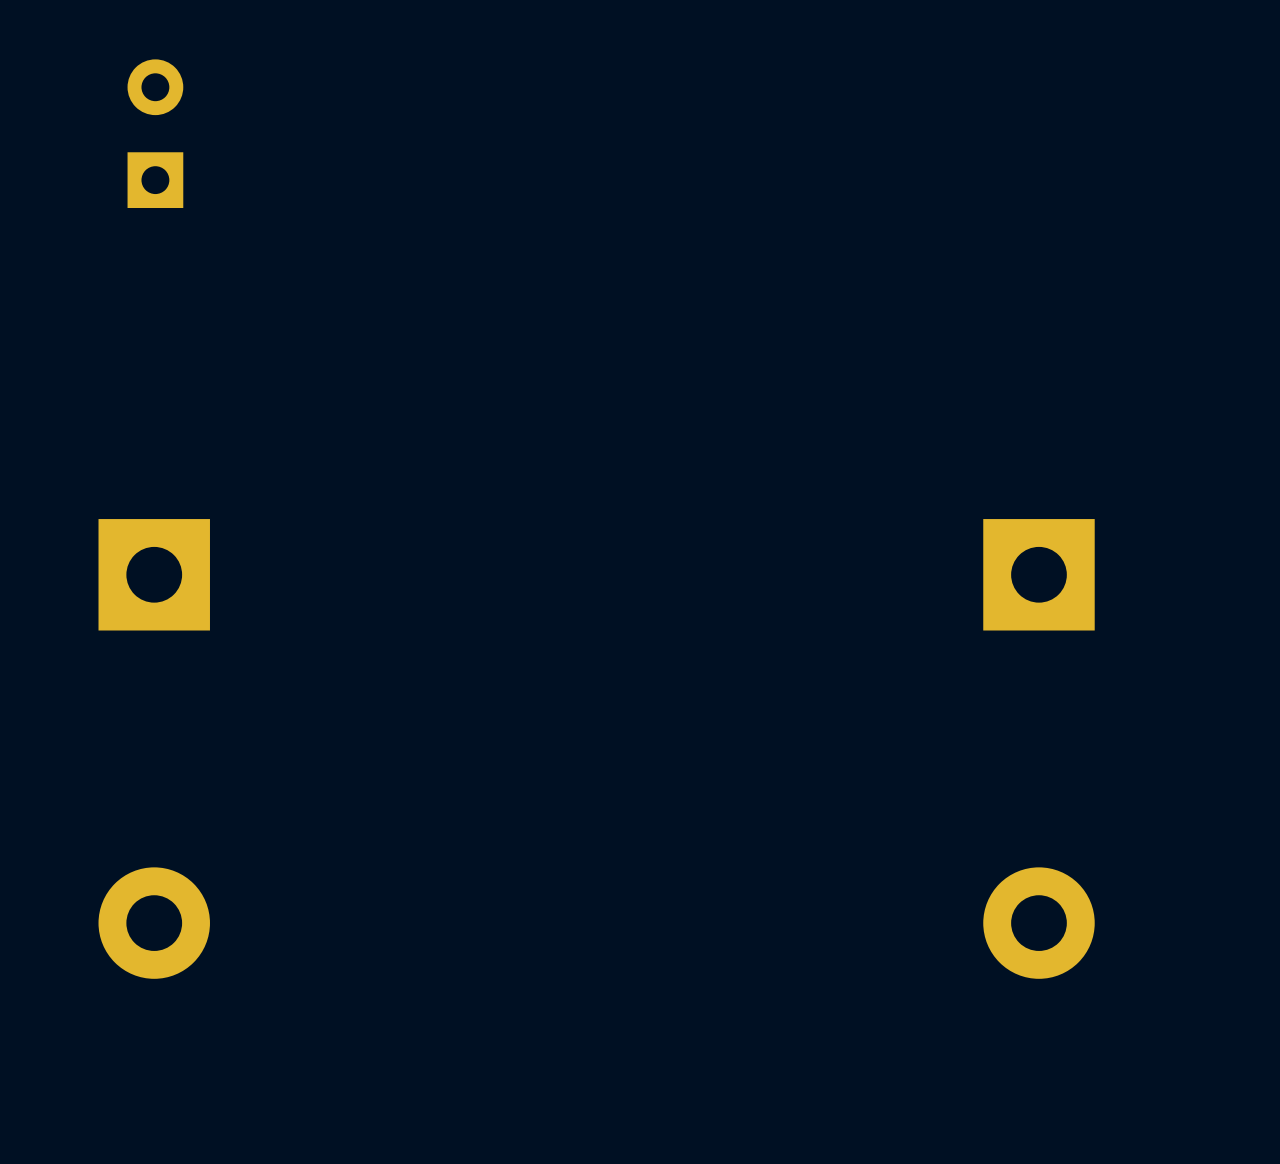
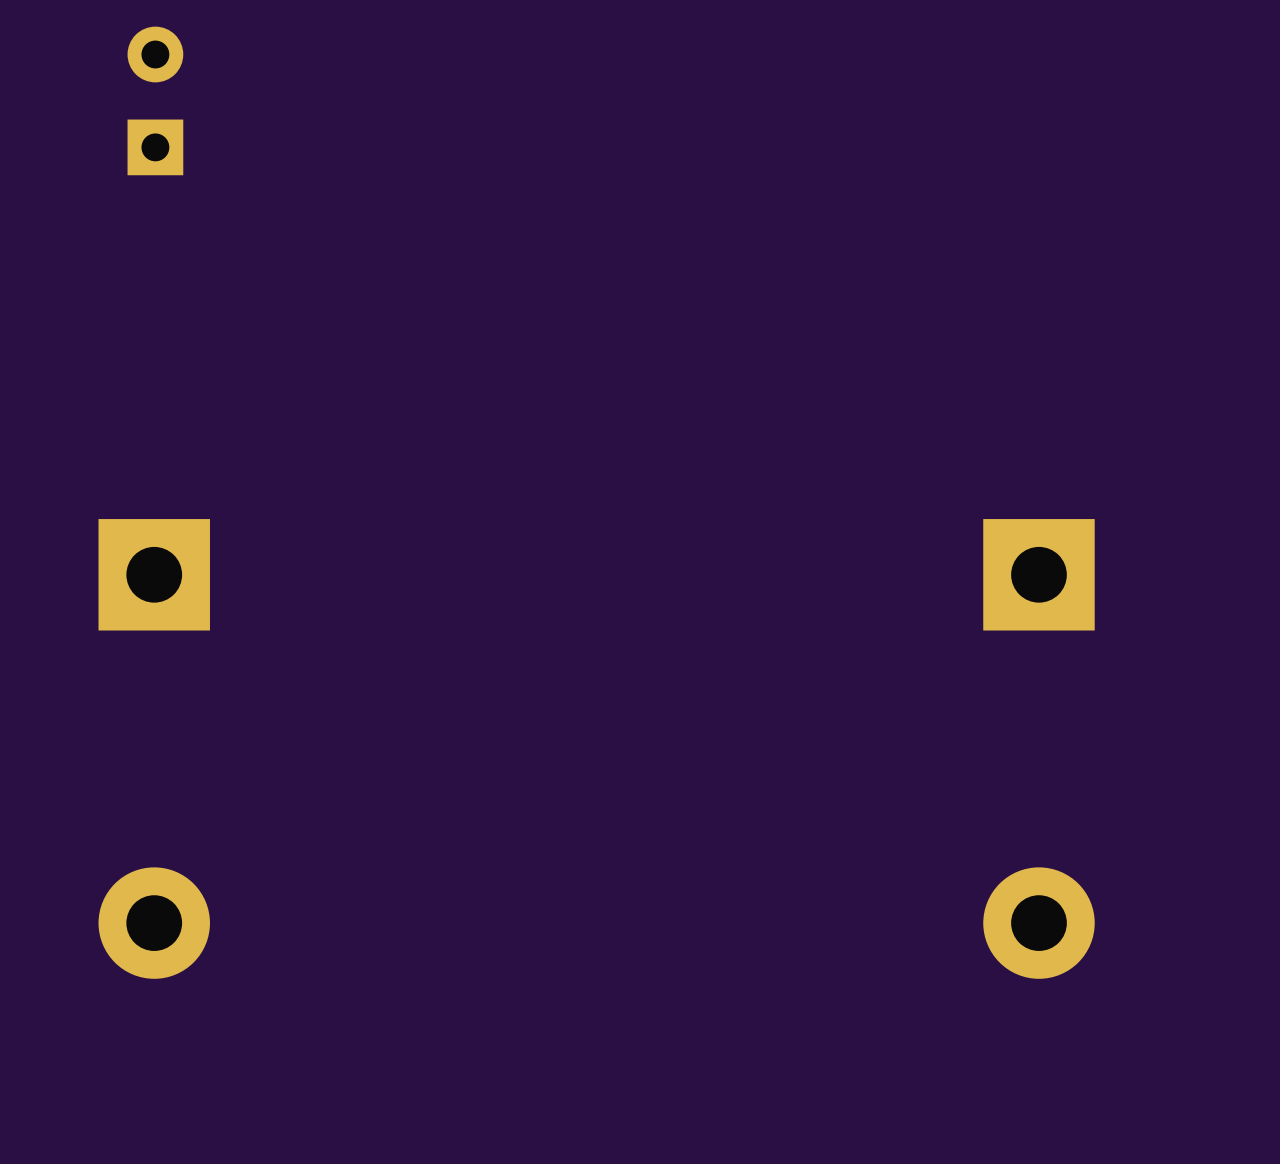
part position: (155, 133) -> (155, 100)

